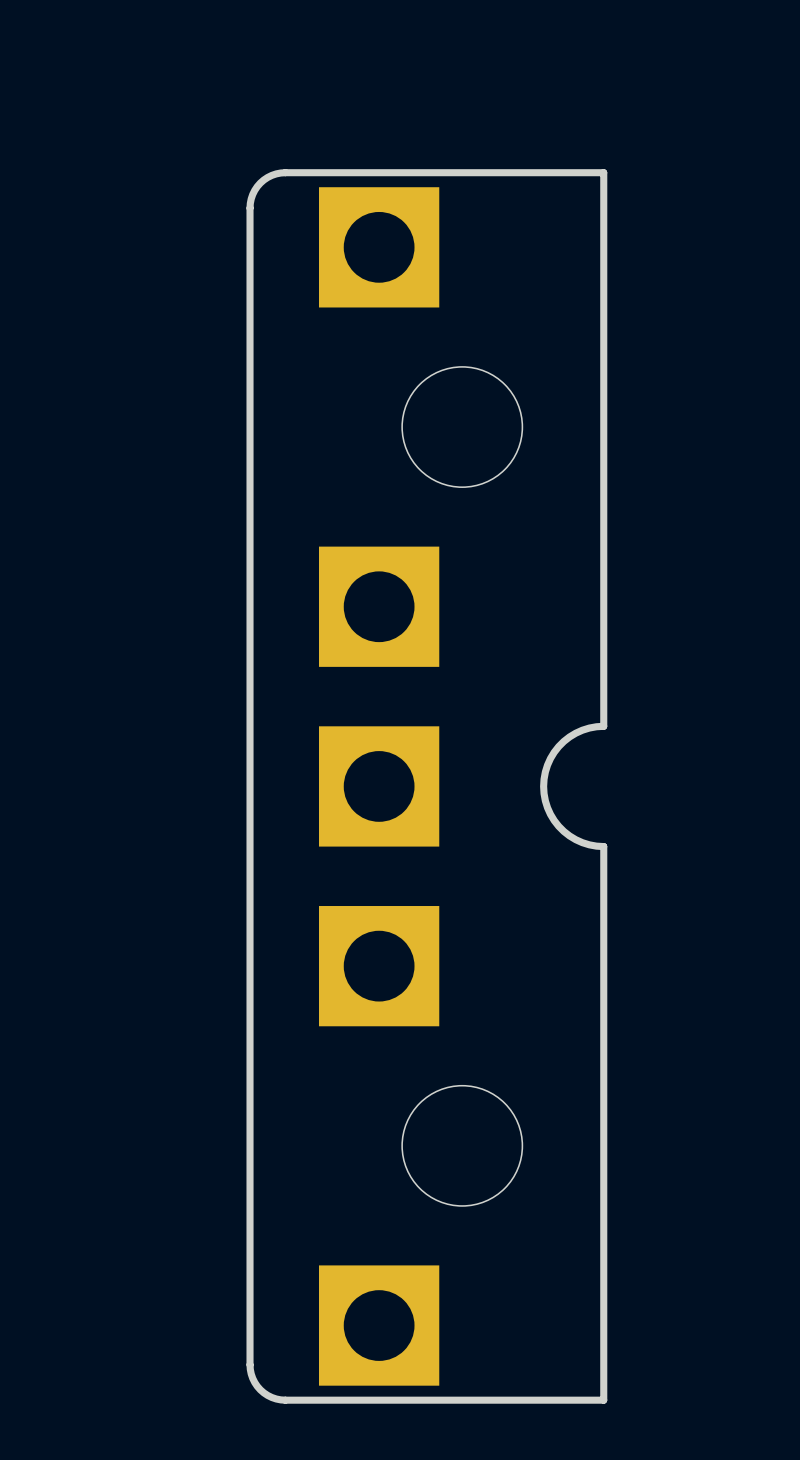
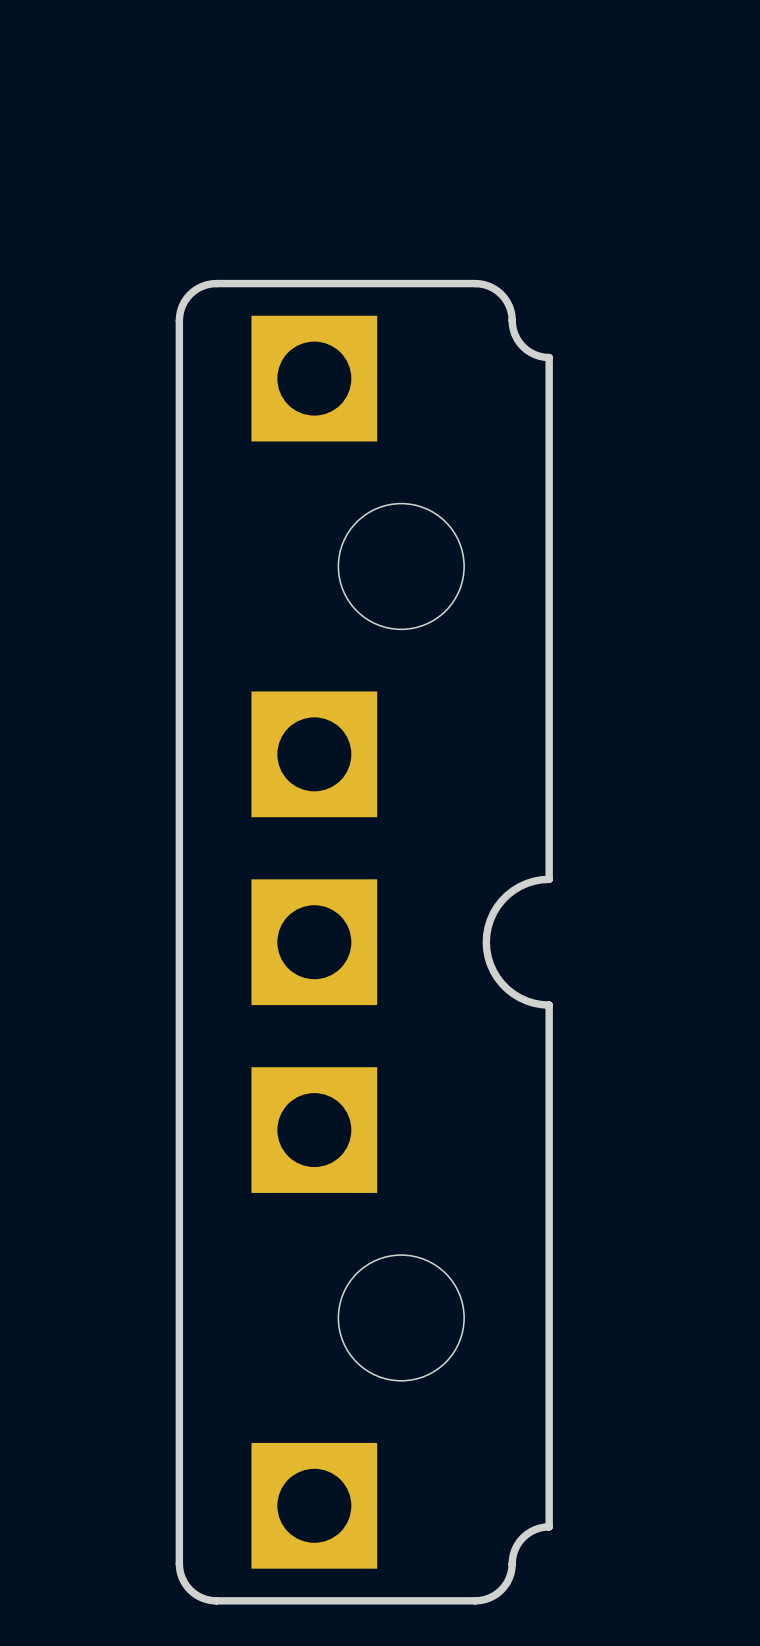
board edge: (250, 208) (252, 194) (260, 183) (271, 175) (280, 173) (603, 172) (603, 227) -> (179, 337) (179, 315) (184, 302) (193, 291) (211, 283) (475, 283) (489, 286) (501, 294) (509, 306) (513, 330) (519, 343) (530, 352) (549, 357)
board edge: (603, 1345) (603, 1400) (280, 1399) (267, 1395) (257, 1386) (251, 1373) (250, 1364) -> (549, 1526) (535, 1529) (519, 1541) (513, 1554) (509, 1578) (501, 1590) (489, 1598) (475, 1600) (211, 1600) (193, 1593) (184, 1582) (179, 1568) (179, 1546)

